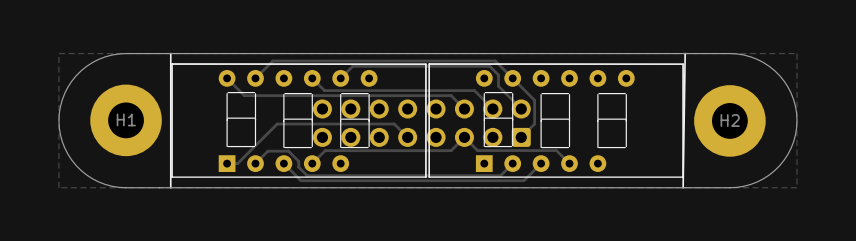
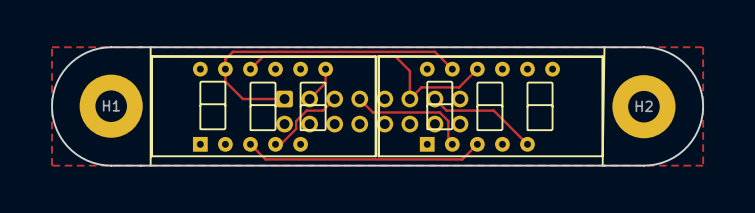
track: (495, 61) (272, 61) (255, 78) -> (437, 53) (434, 51) (232, 51) (225, 59) (225, 81) (242, 99) (284, 99) (286, 100)
track: (227, 78) (244, 95) (451, 95) (464, 108) -> none
track: none -> (250, 69) (263, 56) (395, 56) (409, 70) (409, 99) (421, 87) (459, 87) (477, 69)
track: (312, 78) (324, 90) (474, 90) (492, 108) -> none
track: (340, 78) (352, 66) (489, 66) (498, 75) (498, 86) (521, 108) -> none
track: none -> (325, 69) (325, 83) (309, 99)
track: (512, 78) (534, 100) (534, 124) (521, 137) -> none
track: none -> (434, 99) (446, 110) (493, 110) (527, 144)
part rotation: 0° (421, 123) -> 180° (372, 111)
track: (407, 137) (394, 124) (277, 124) (237, 163) (227, 163) -> none
track: (255, 163) (267, 151) (288, 151) (298, 161) (298, 167) (307, 175) (500, 175) (512, 163) -> (359, 99) (372, 112) (439, 112) (448, 121) (448, 140) (452, 144)
track: (312, 163) (325, 150) (451, 150) (464, 137) (477, 150) (556, 150) (569, 163) -> (275, 144) (280, 144) (296, 128) (296, 121) (306, 110) (323, 110) (334, 99)

